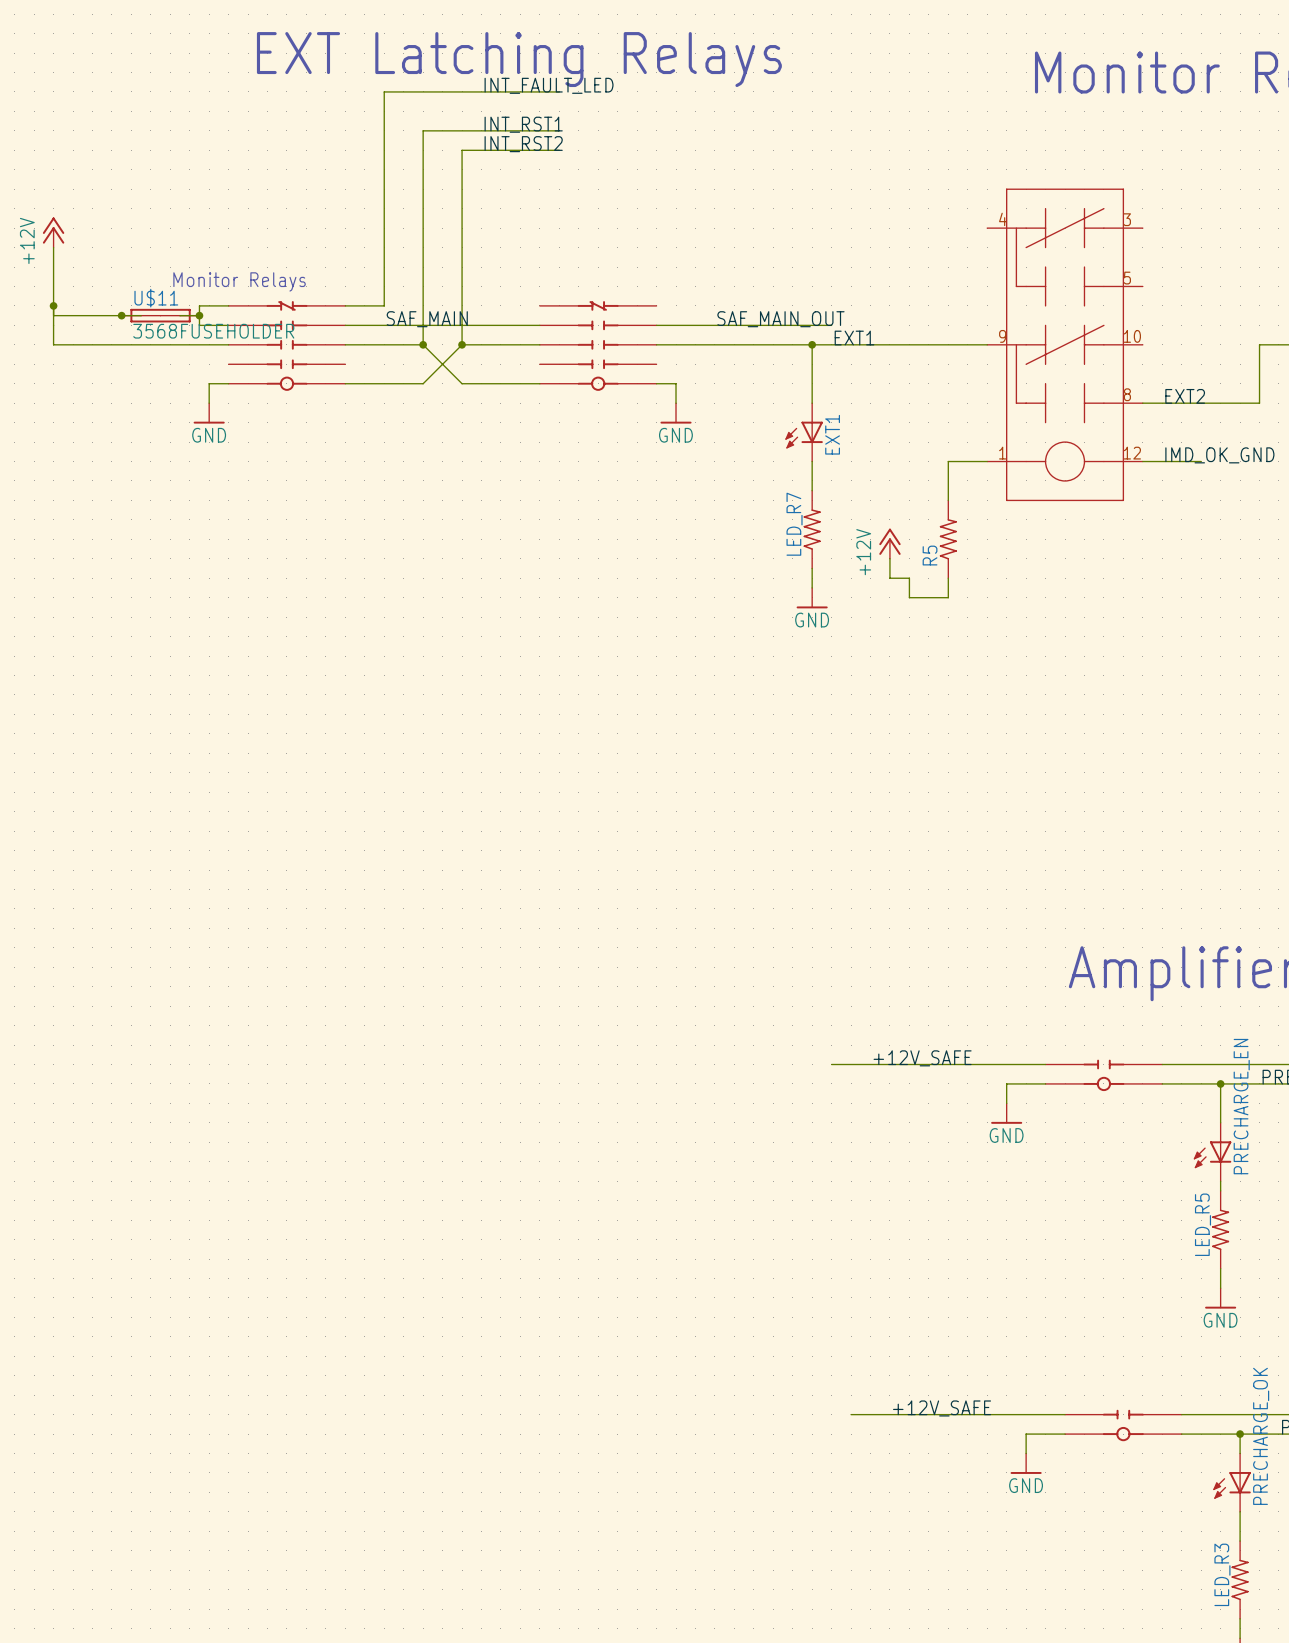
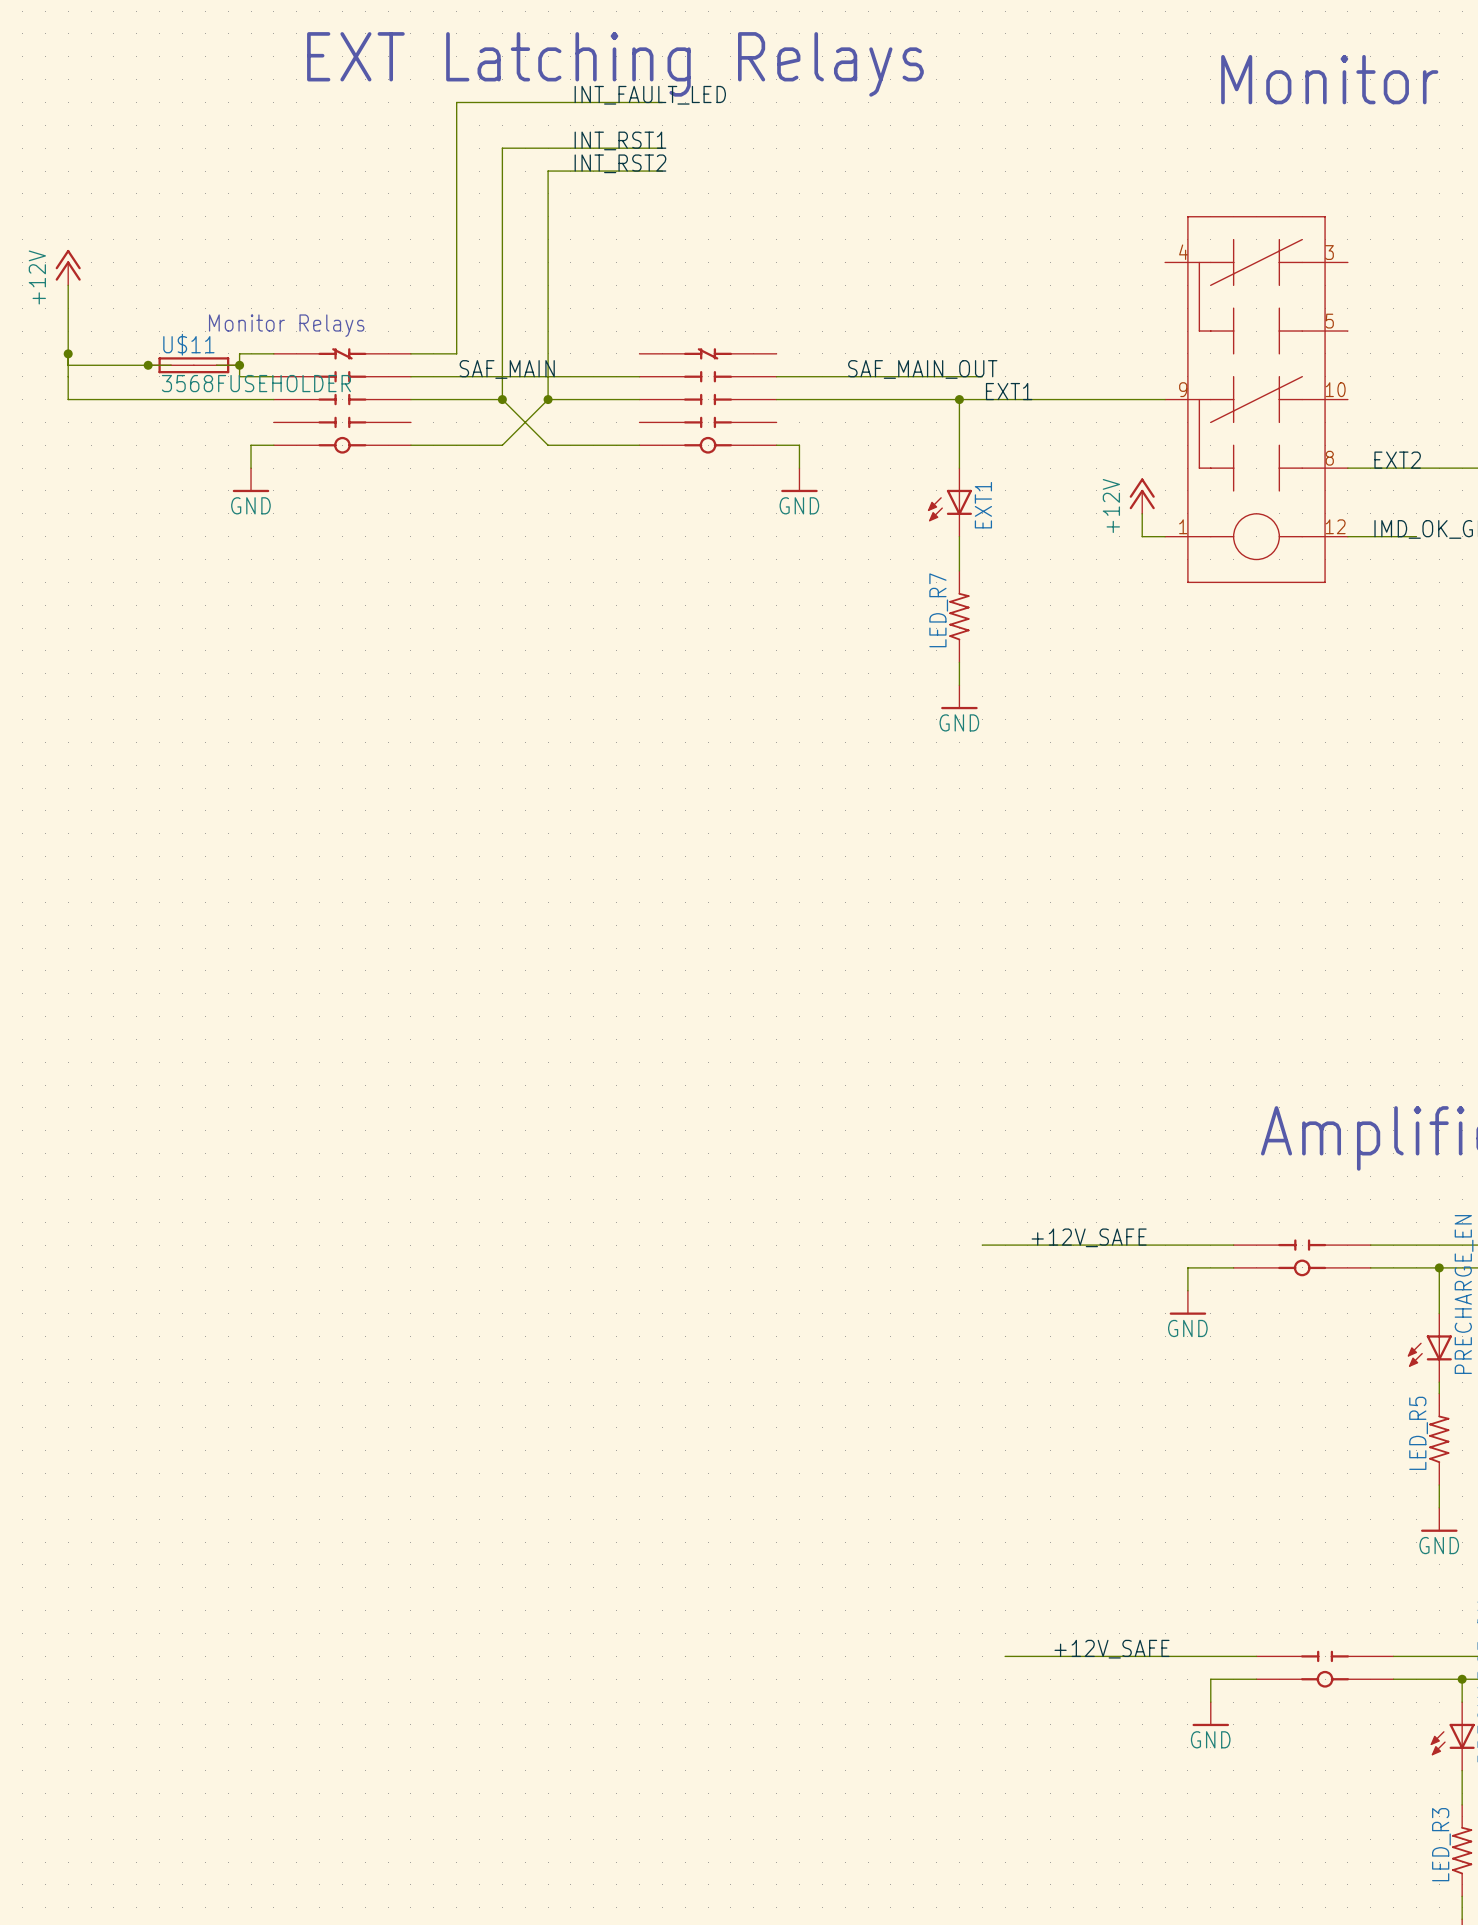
wire: (967, 461) (948, 461) (948, 500) -> (1142, 536) (1142, 513)
R5: (948, 539) -> none
power symbol position: +12V (889, 543) -> +12V (1142, 496)
wire: (889, 558) (889, 578) (909, 578) (909, 597) (948, 597) (948, 578) -> none

